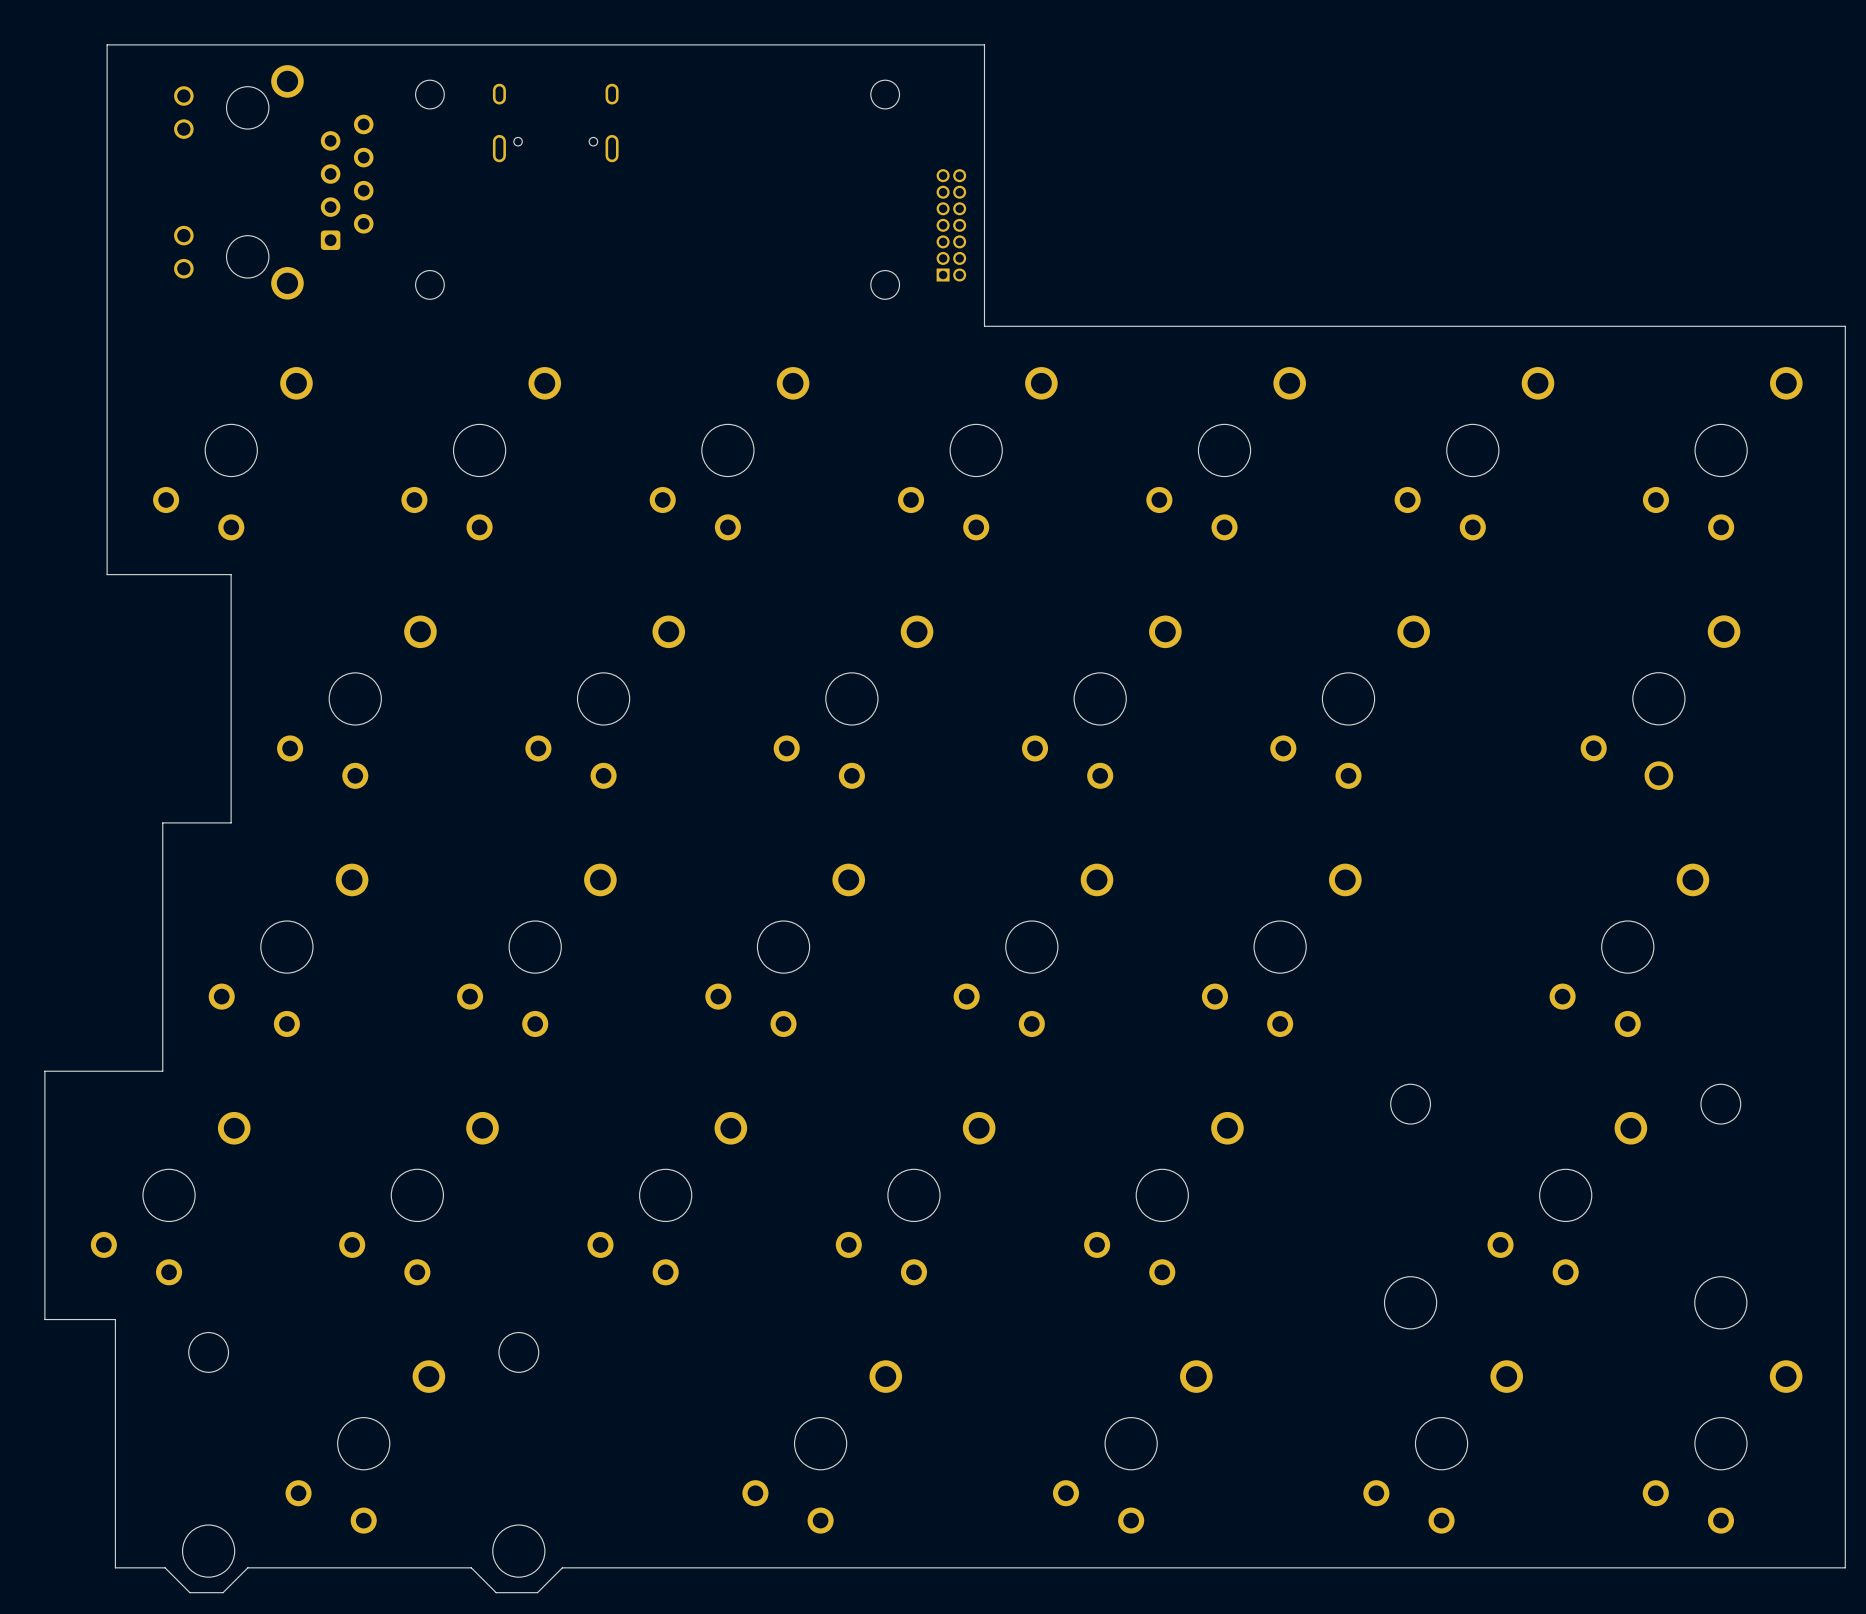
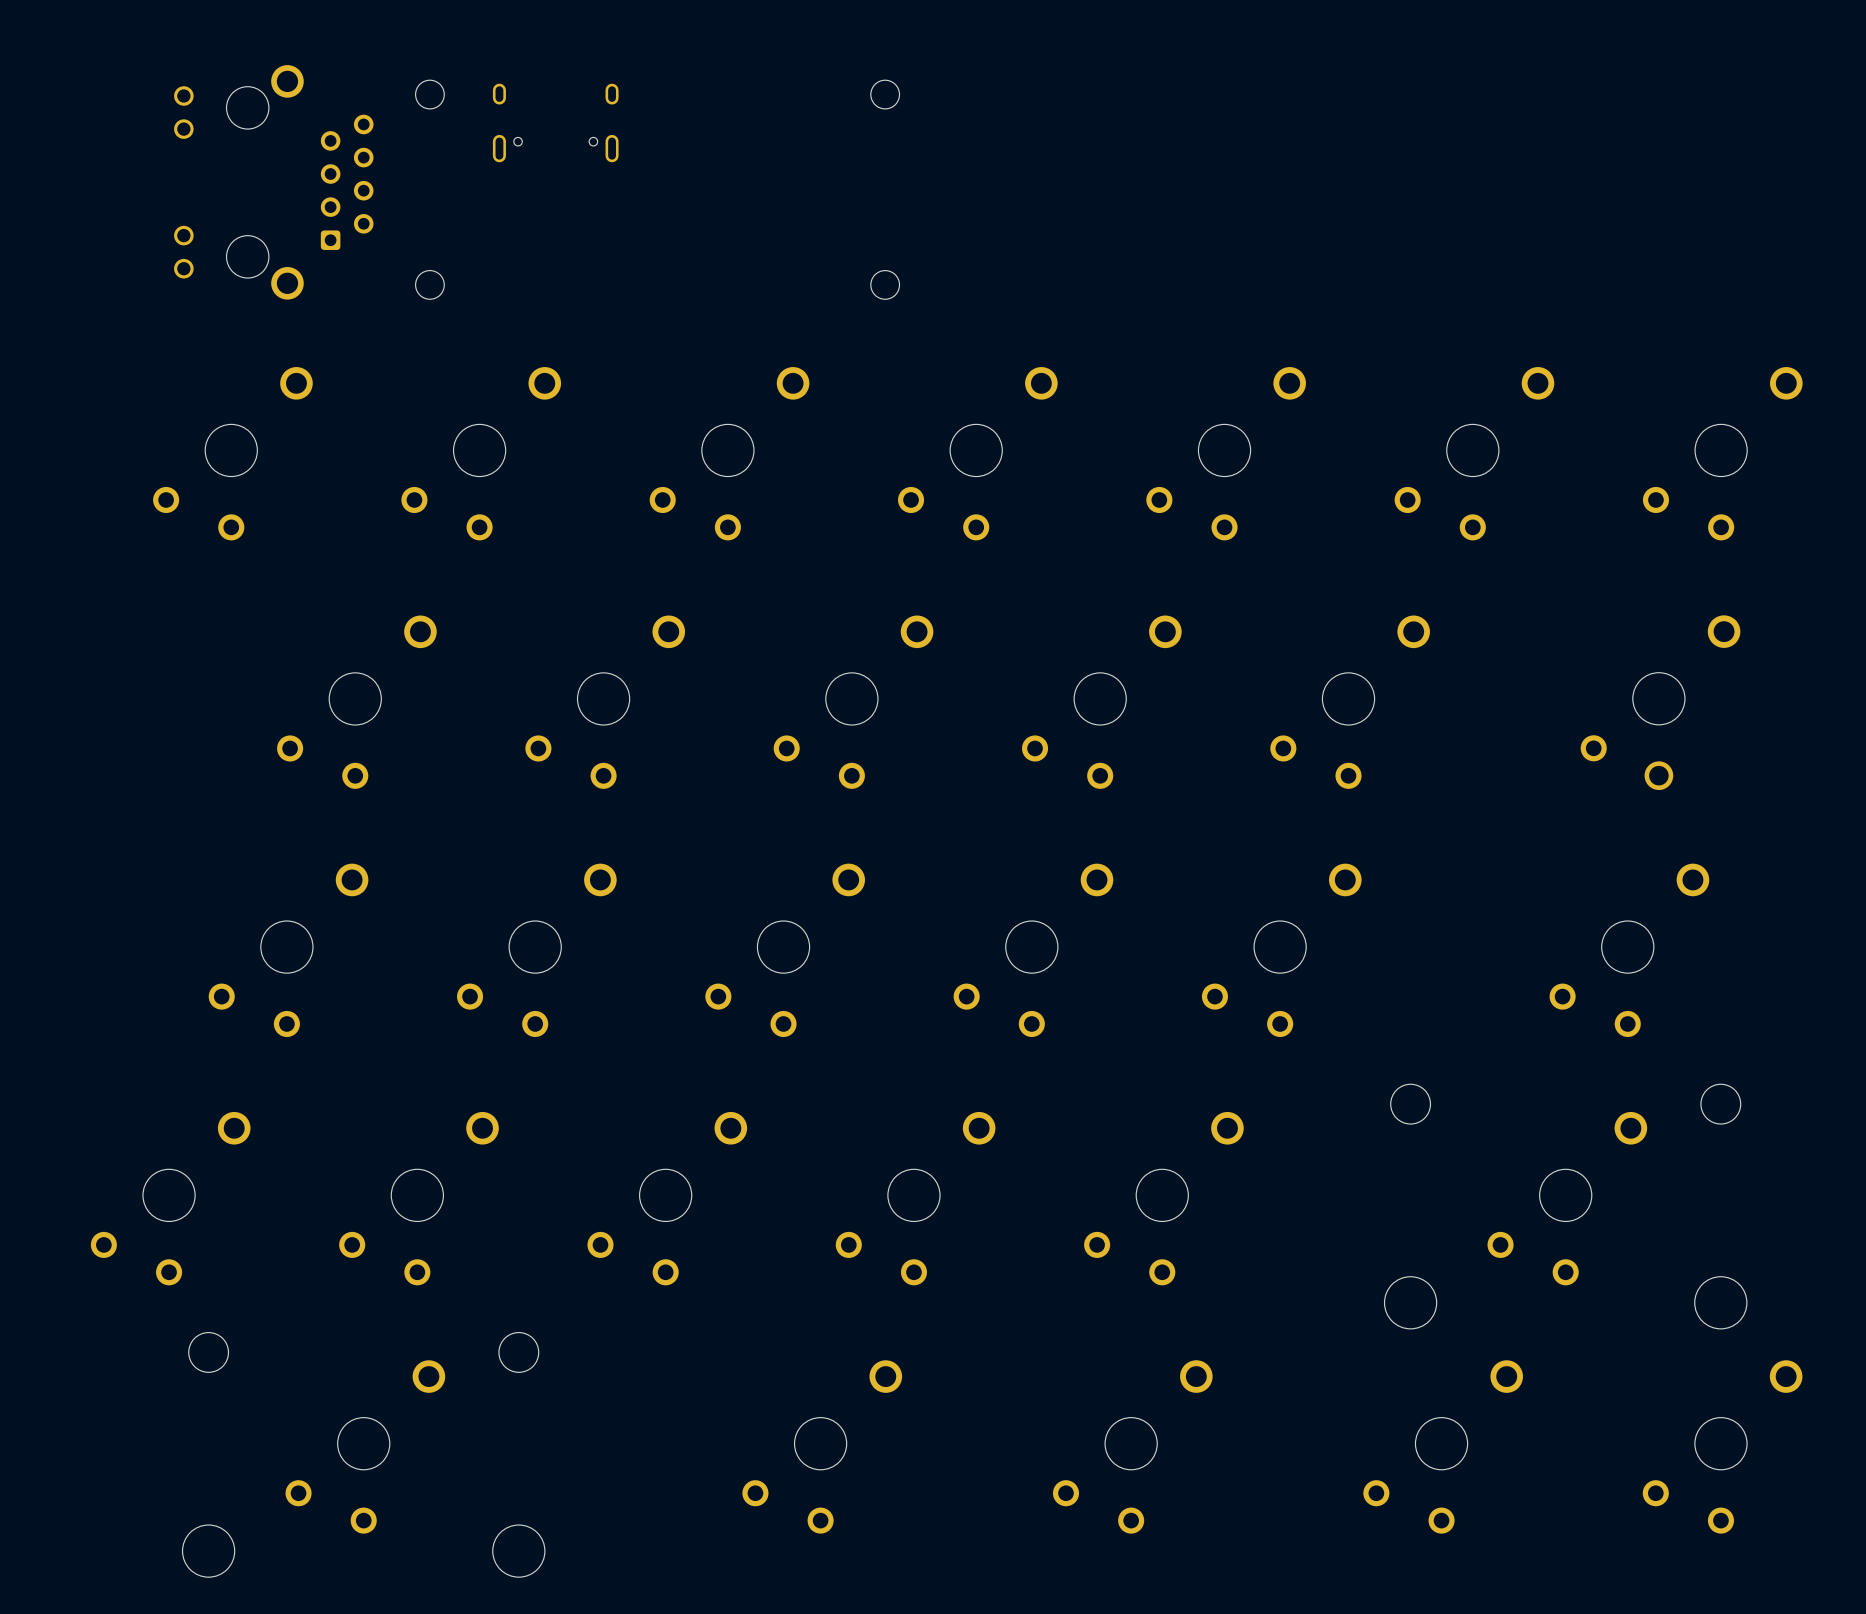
board edge: (984, 44) (984, 326) (1845, 326) (1845, 1567) (562, 1567) (537, 1592) (496, 1592) (471, 1567) (247, 1567) (223, 1592) (189, 1592) (165, 1567) (115, 1567) (115, 1319) (44, 1319) (44, 1071) (162, 1071) (162, 822) (231, 822) (231, 574) (107, 574) (107, 44) (984, 44) -> none
part: (951, 225) -> none

